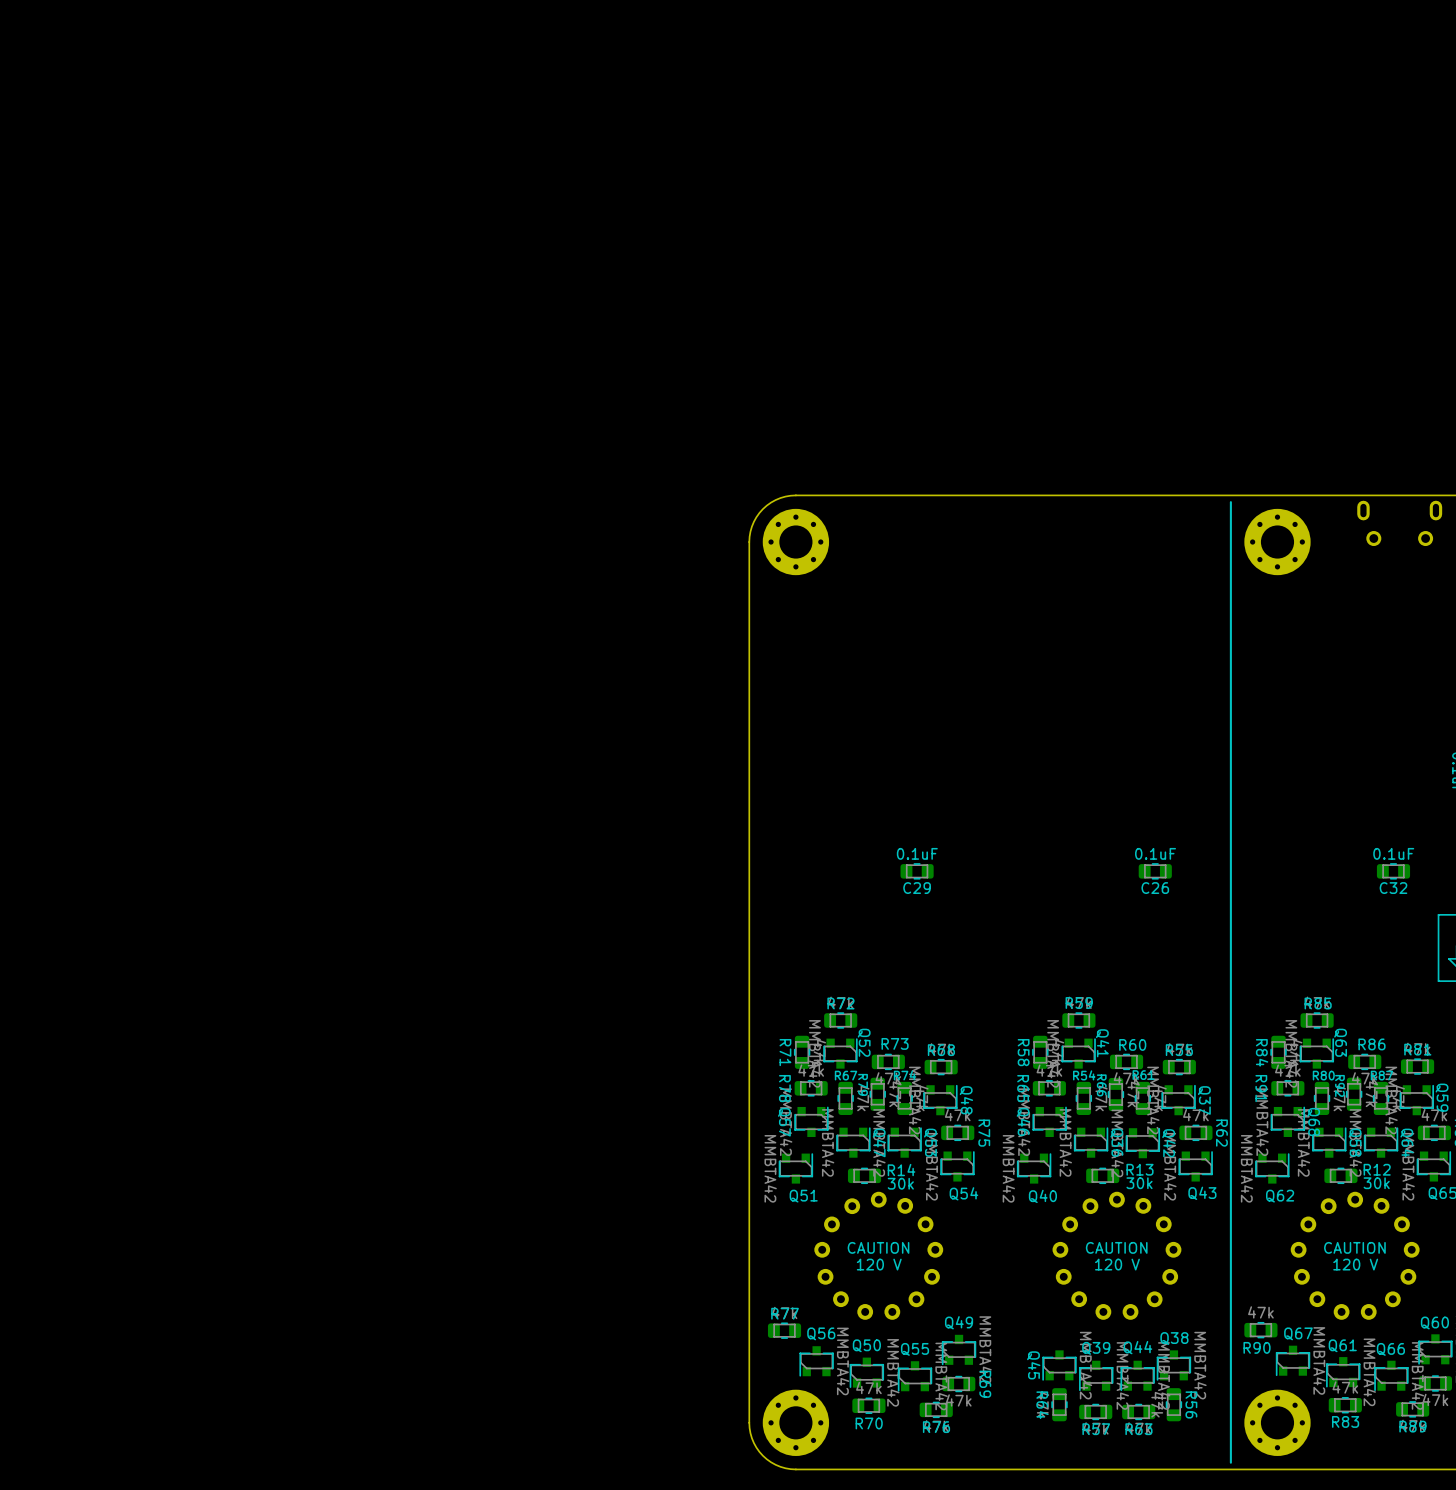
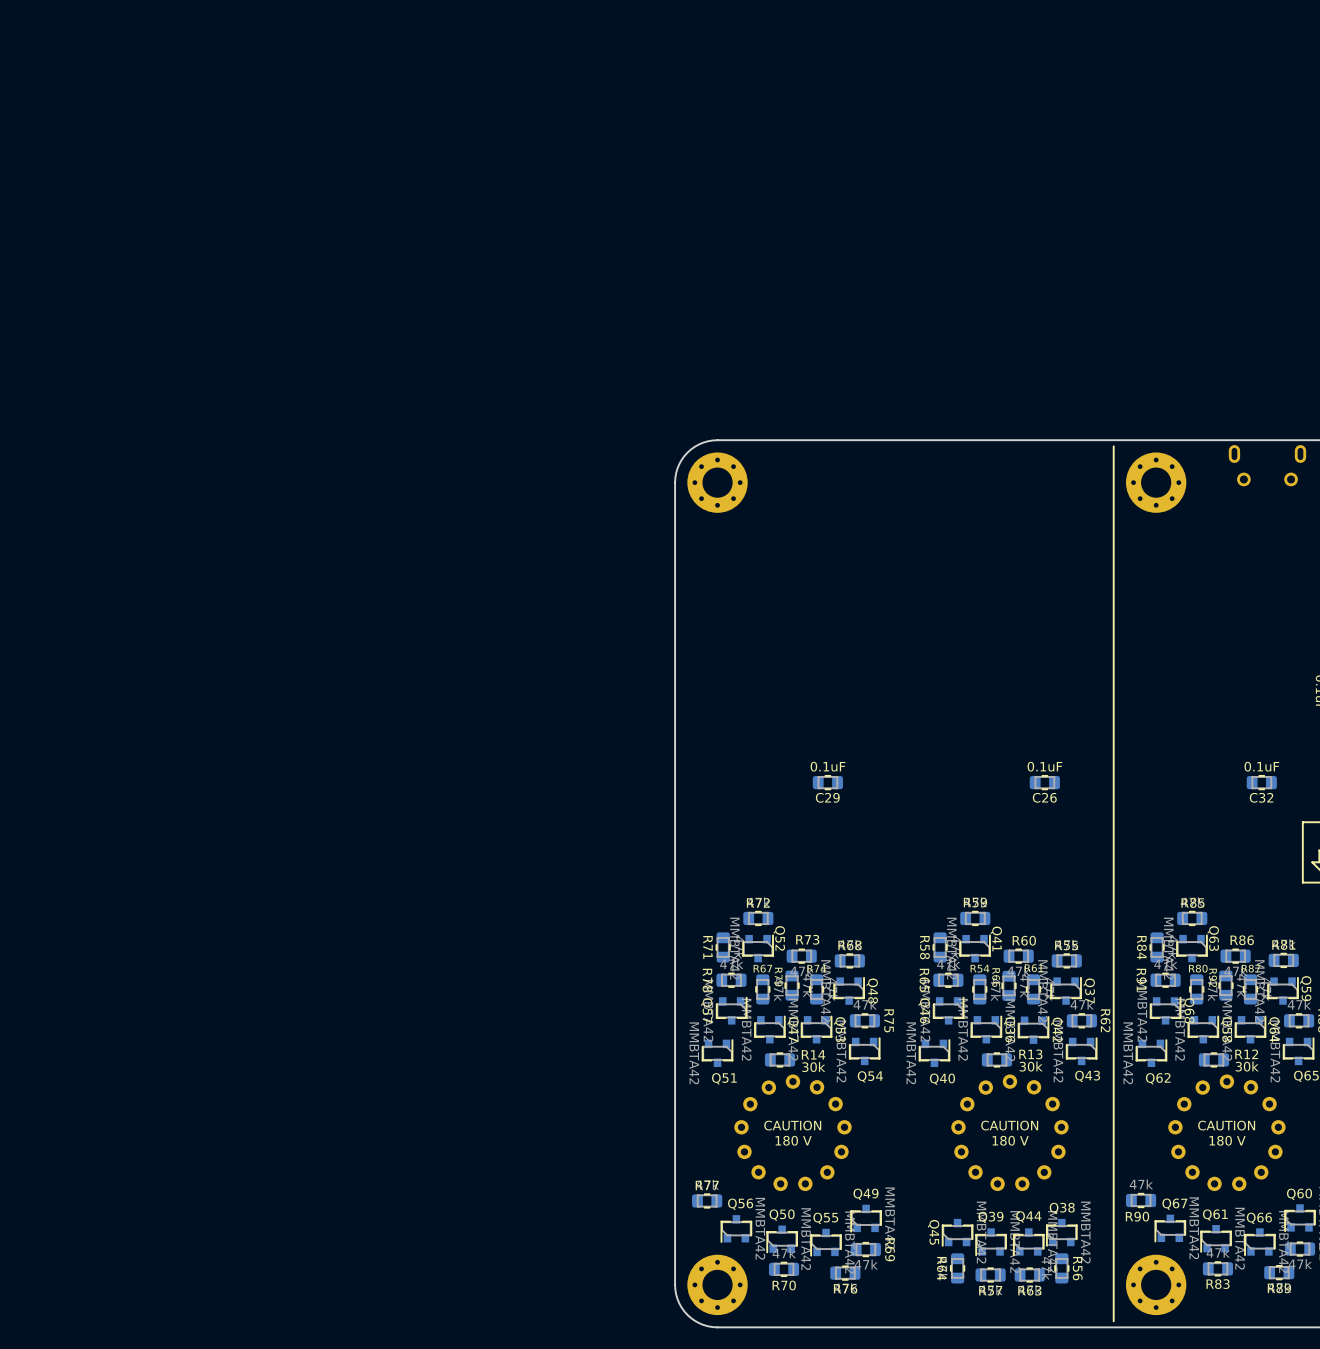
text: 120 V (879, 1264) -> 180 V (793, 1140)
text: 120 V (1117, 1264) -> 180 V (1010, 1140)
text: 120 V (1355, 1264) -> 180 V (1227, 1140)

